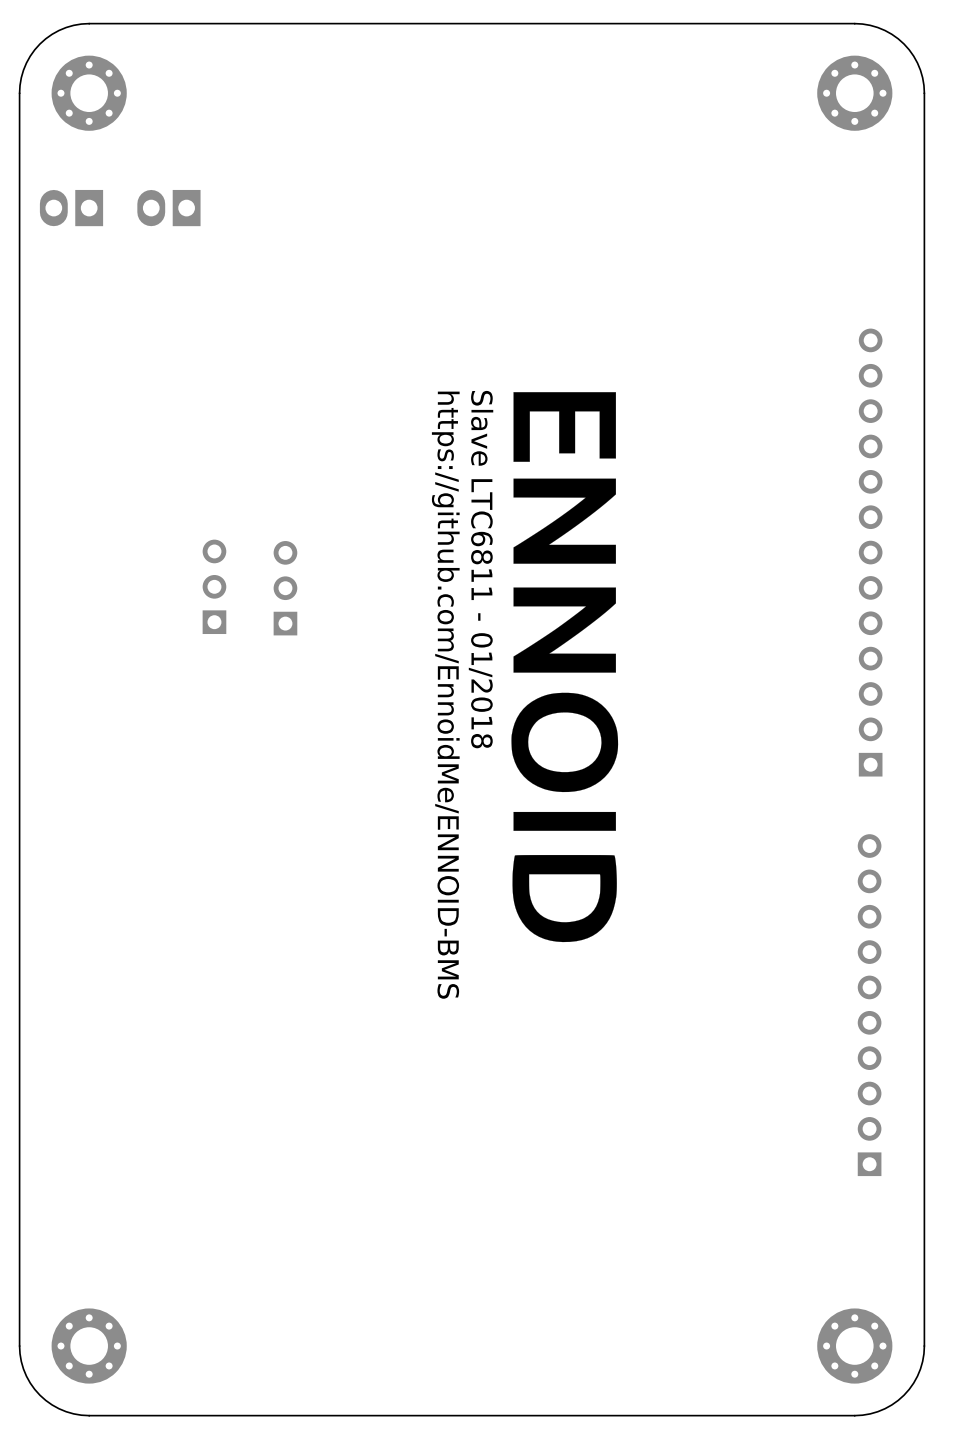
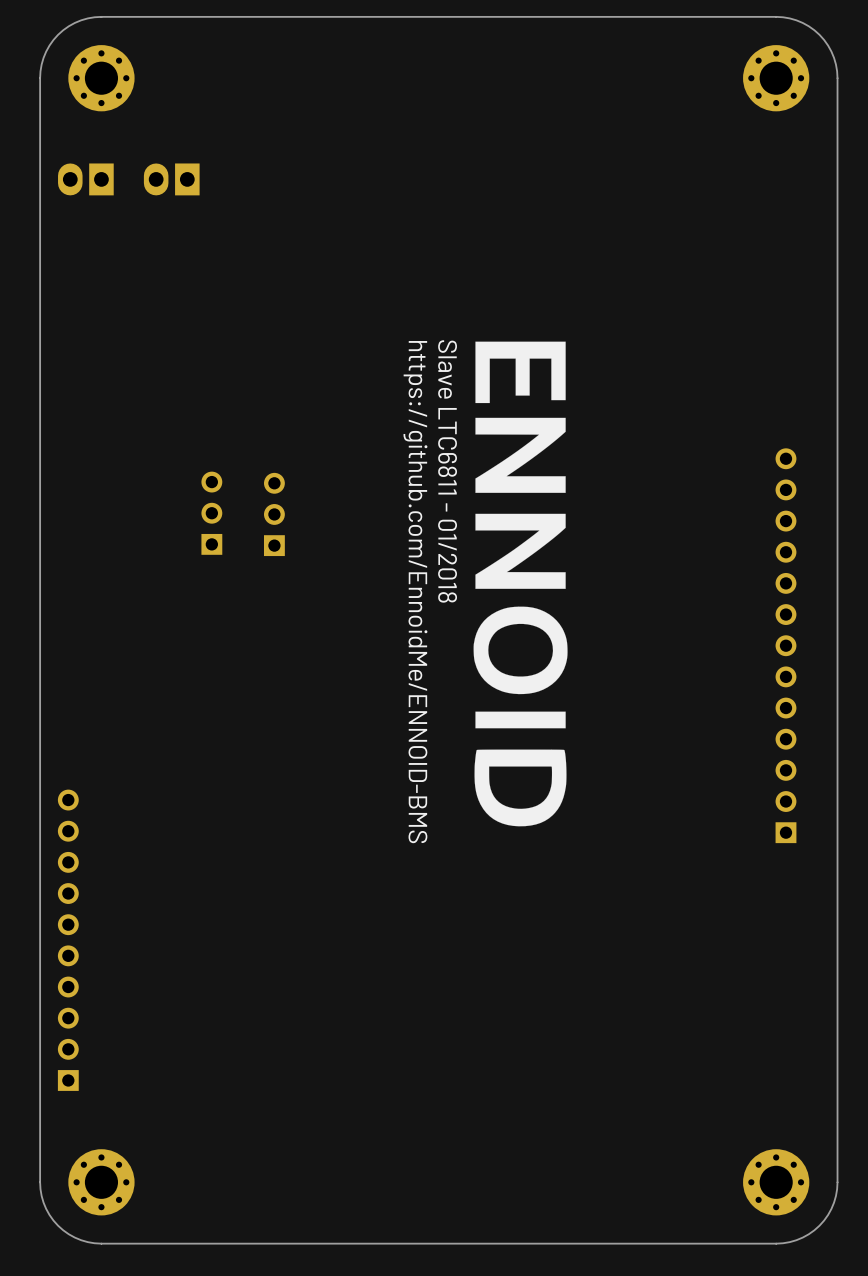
part position: (870, 552) -> (785, 645)
part: (869, 1005) -> none
part: none -> (68, 940)

